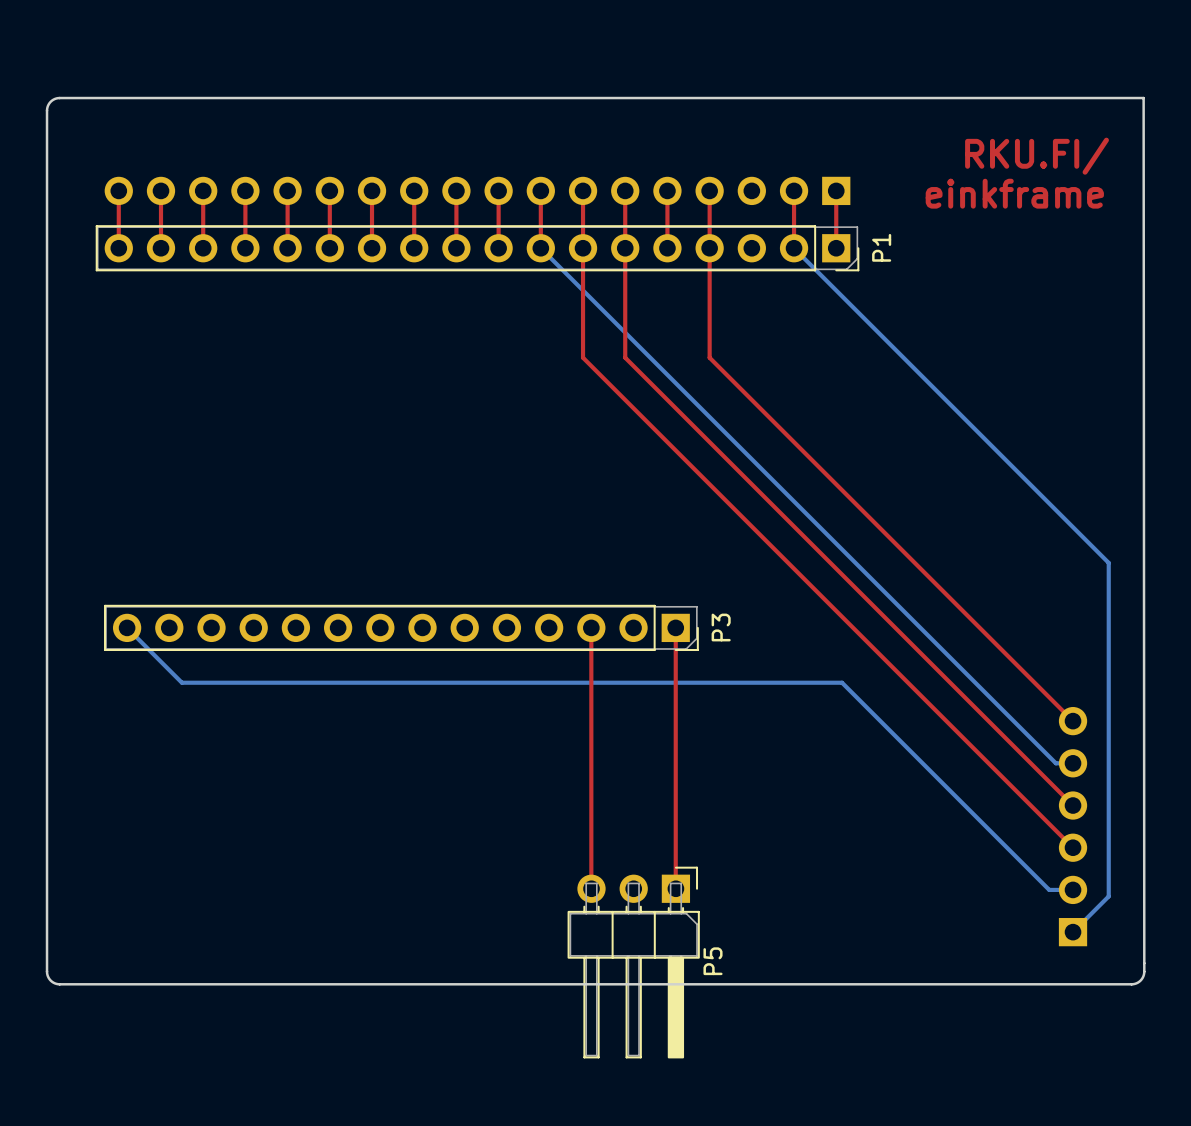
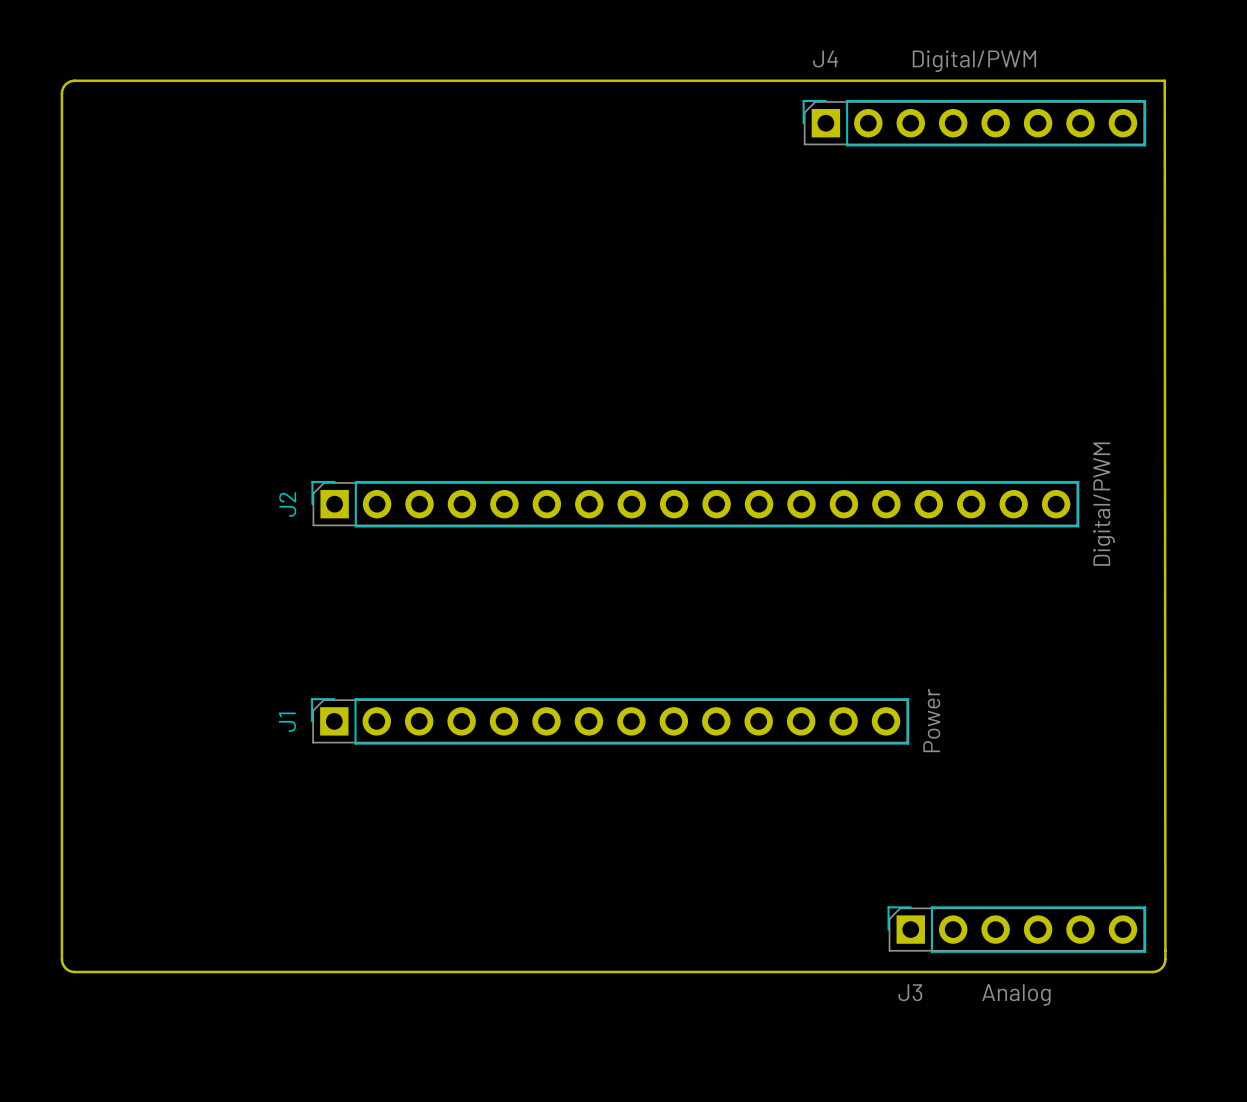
J4: none -> Digital/PWM (974, 123)
text: RKU.FI/ (1037, 156) -> none
top track: (118, 190) (118, 248) -> none
top track: (161, 190) (161, 248) -> none
top track: (203, 190) (203, 248) -> none
top track: (245, 190) (245, 248) -> none
top track: (287, 190) (287, 248) -> none
top track: (329, 190) (329, 248) -> none
top track: (372, 190) (372, 248) -> none
top track: (414, 190) (414, 248) -> none
top track: (456, 190) (456, 248) -> none
part: (477, 190) -> none
top track: (498, 190) (498, 248) -> none
top track: (540, 190) (540, 248) -> none
top track: (583, 190) (583, 357) (1073, 847) -> none
top track: (625, 190) (625, 357) (1073, 805) -> none
top track: (667, 190) (667, 248) -> none
top track: (709, 190) (709, 357) (1073, 721) -> none
top track: (794, 190) (794, 248) -> none
top track: (836, 190) (836, 248) -> none
text: einkframe (1014, 193) -> none
P1: (477, 248) -> none
bottom track: (540, 248) (1055, 763) (1073, 763) -> none
bottom track: (794, 248) (1108, 562) (1108, 896) (1073, 932) -> none
J2: none -> Digital/PWM (695, 504)
bottom track: (127, 627) (181, 682) (842, 682) (1049, 889) (1073, 889) -> none
P3: (401, 627) -> none
top track: (591, 627) (591, 888) -> none
top track: (675, 627) (675, 888) -> none
J1: none -> Power (610, 721)
part: (1073, 826) -> none
J3: none -> Analog (1016, 929)
P5: (633, 962) -> none

